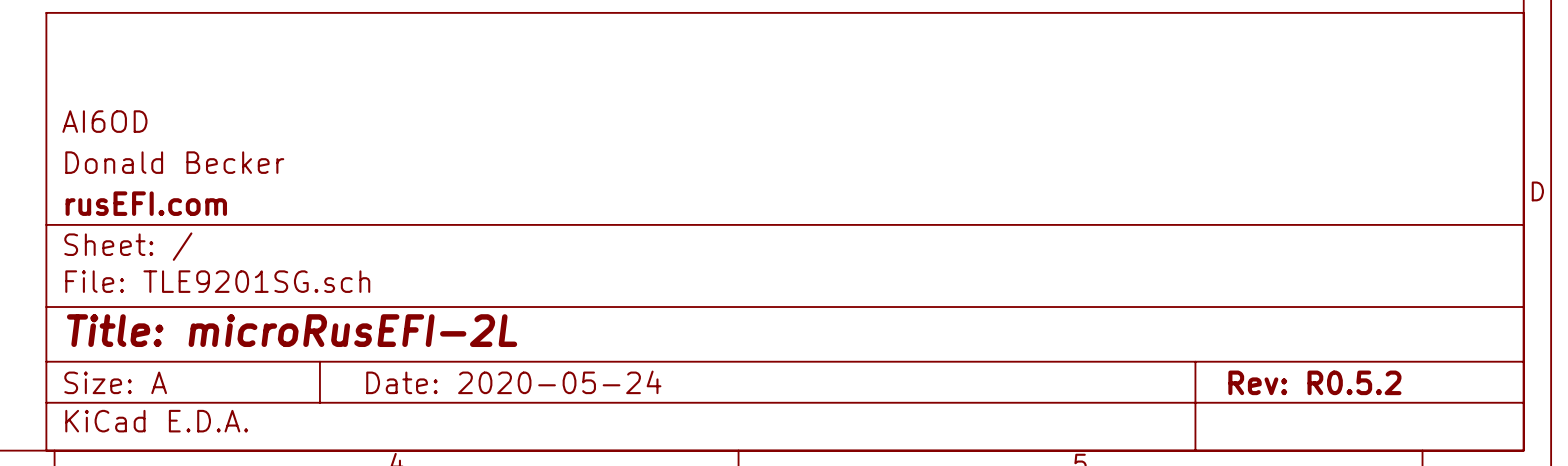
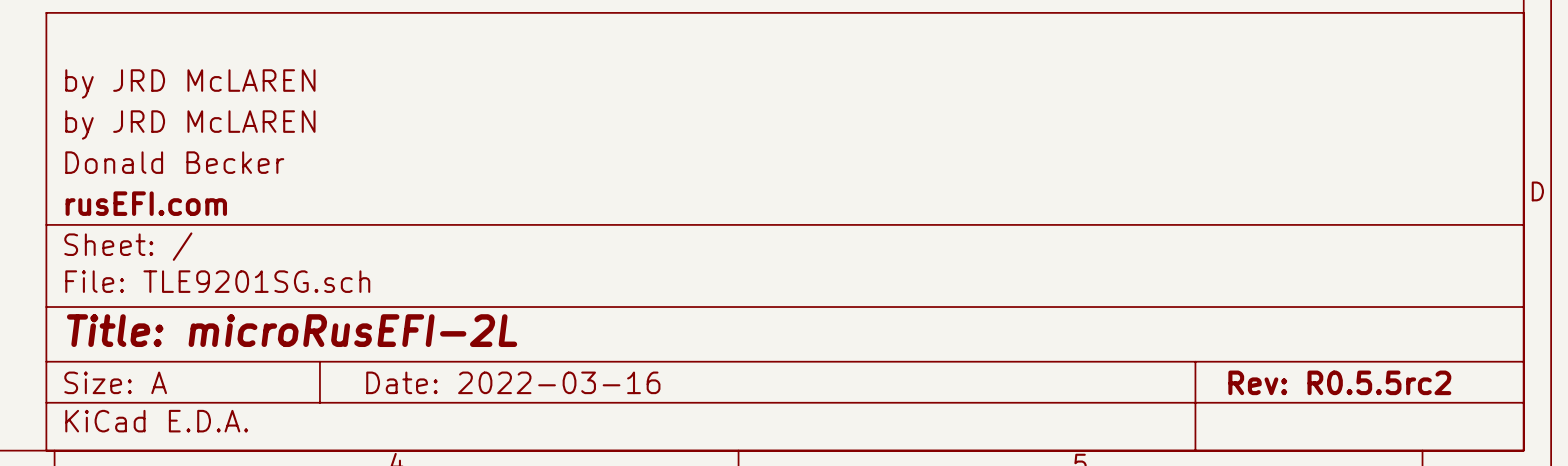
title block: none -> by JRD McLAREN (190, 83)
title block: AI6OD (104, 121) -> by JRD McLAREN (190, 124)
title block: Date: 2020-05-24 (513, 382) -> Date: 2022-03-16 (513, 382)
title block: Rev: R0.5.2 (1314, 382) -> Rev: R0.5.5rc2 (1339, 382)

